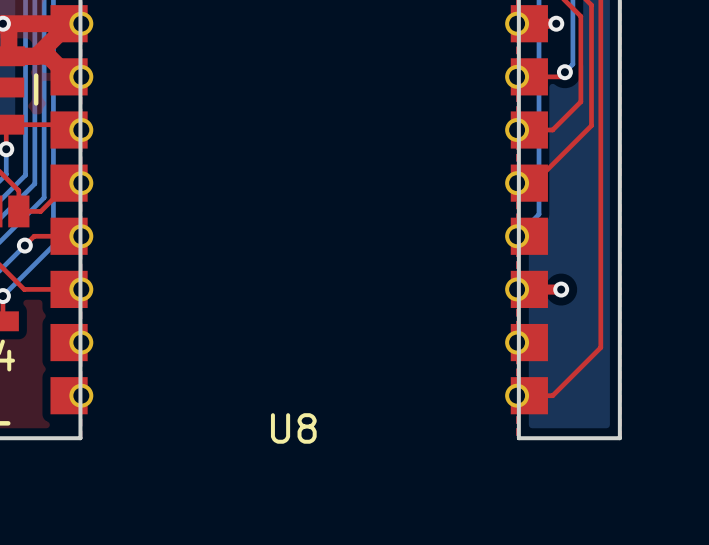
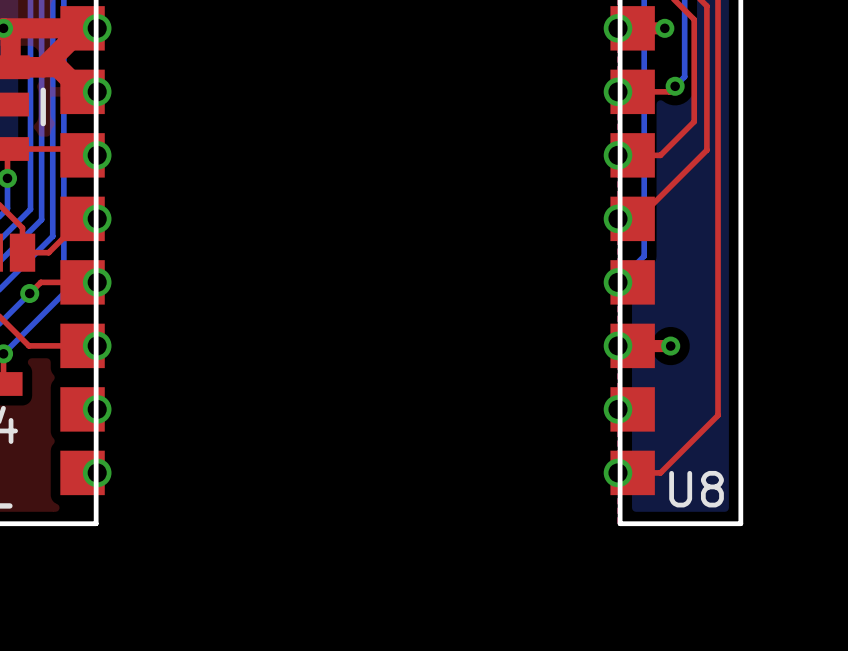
U8 name position: U8 (293, 428) -> U8 (696, 489)

